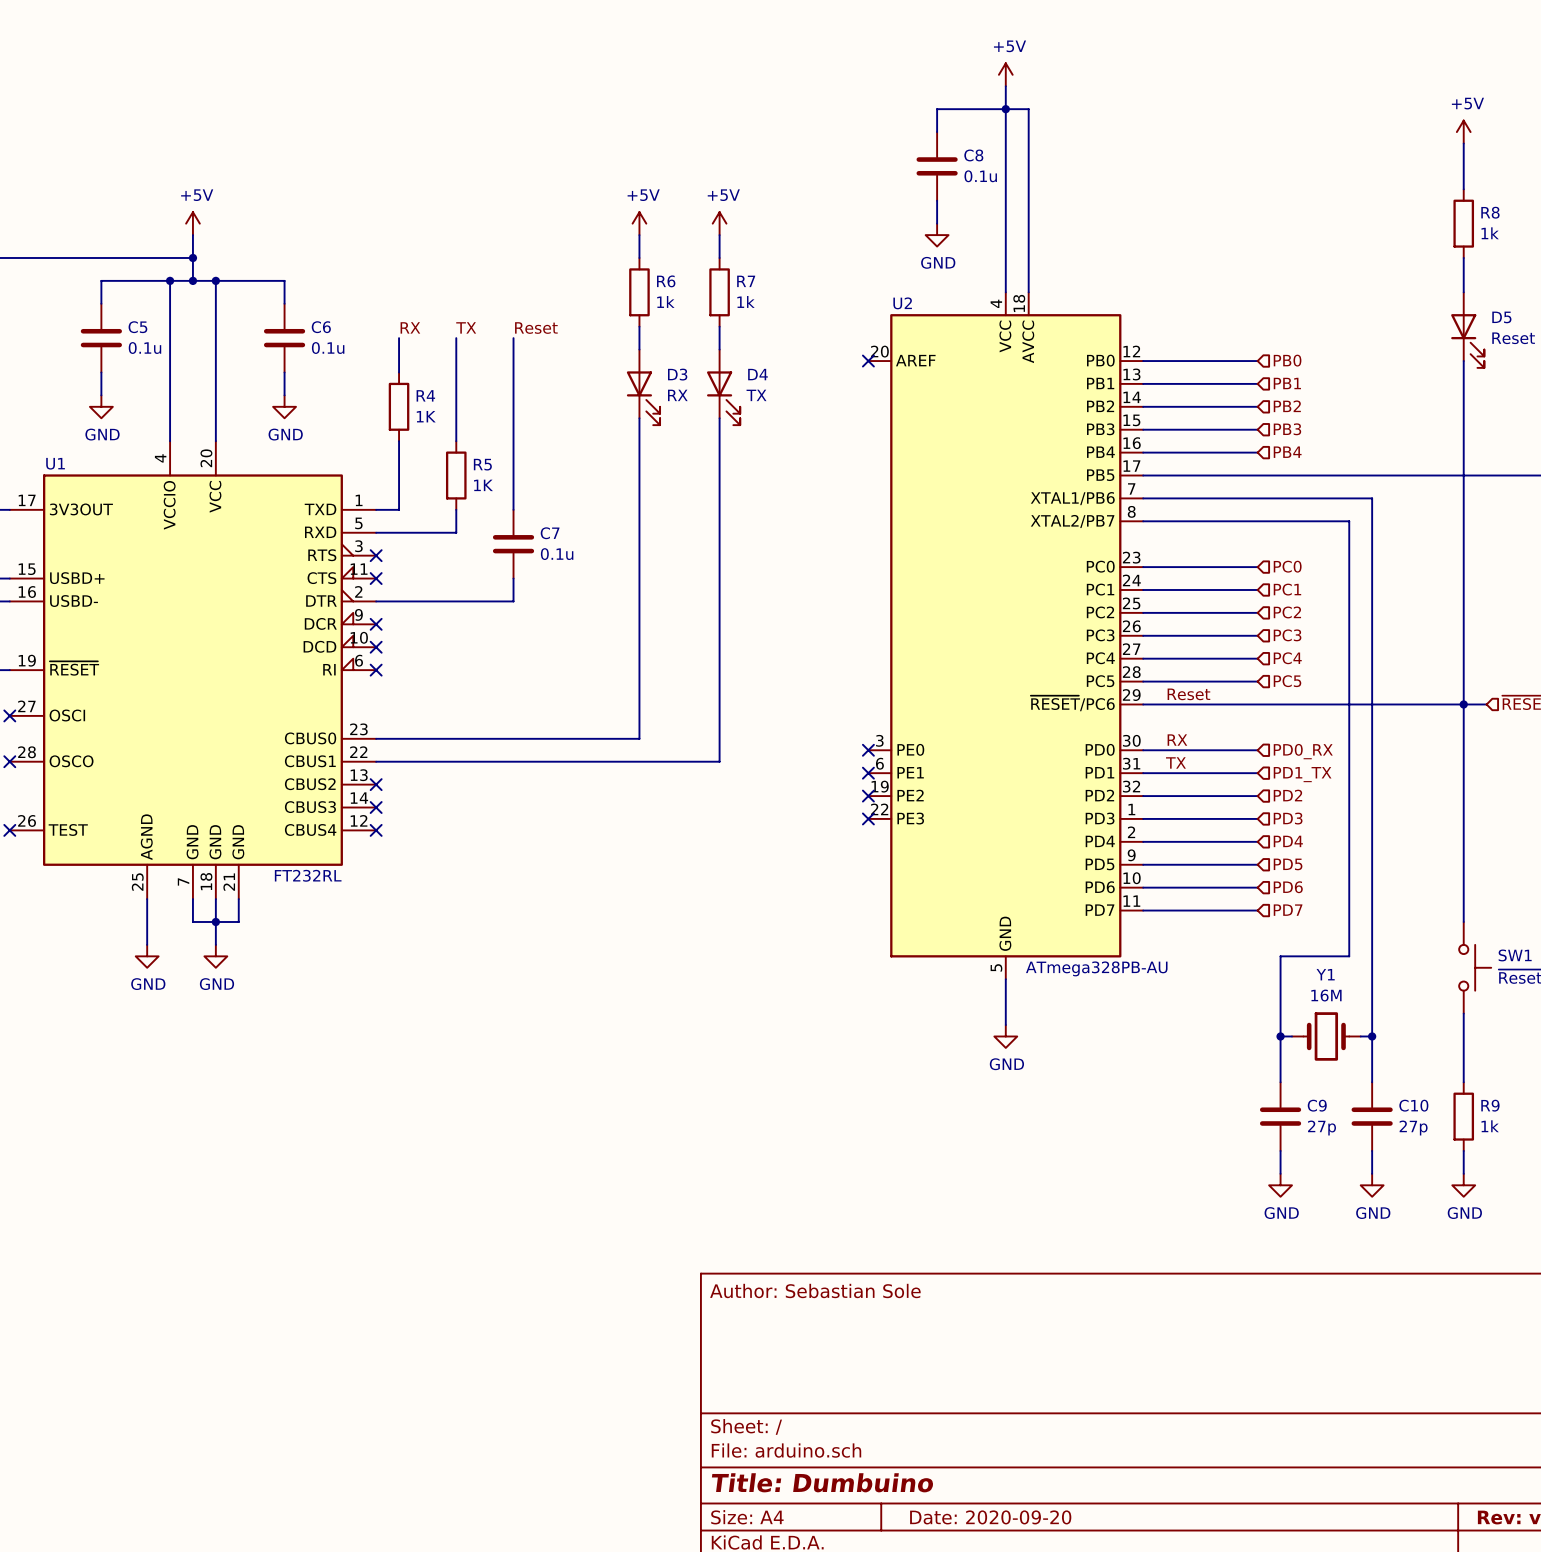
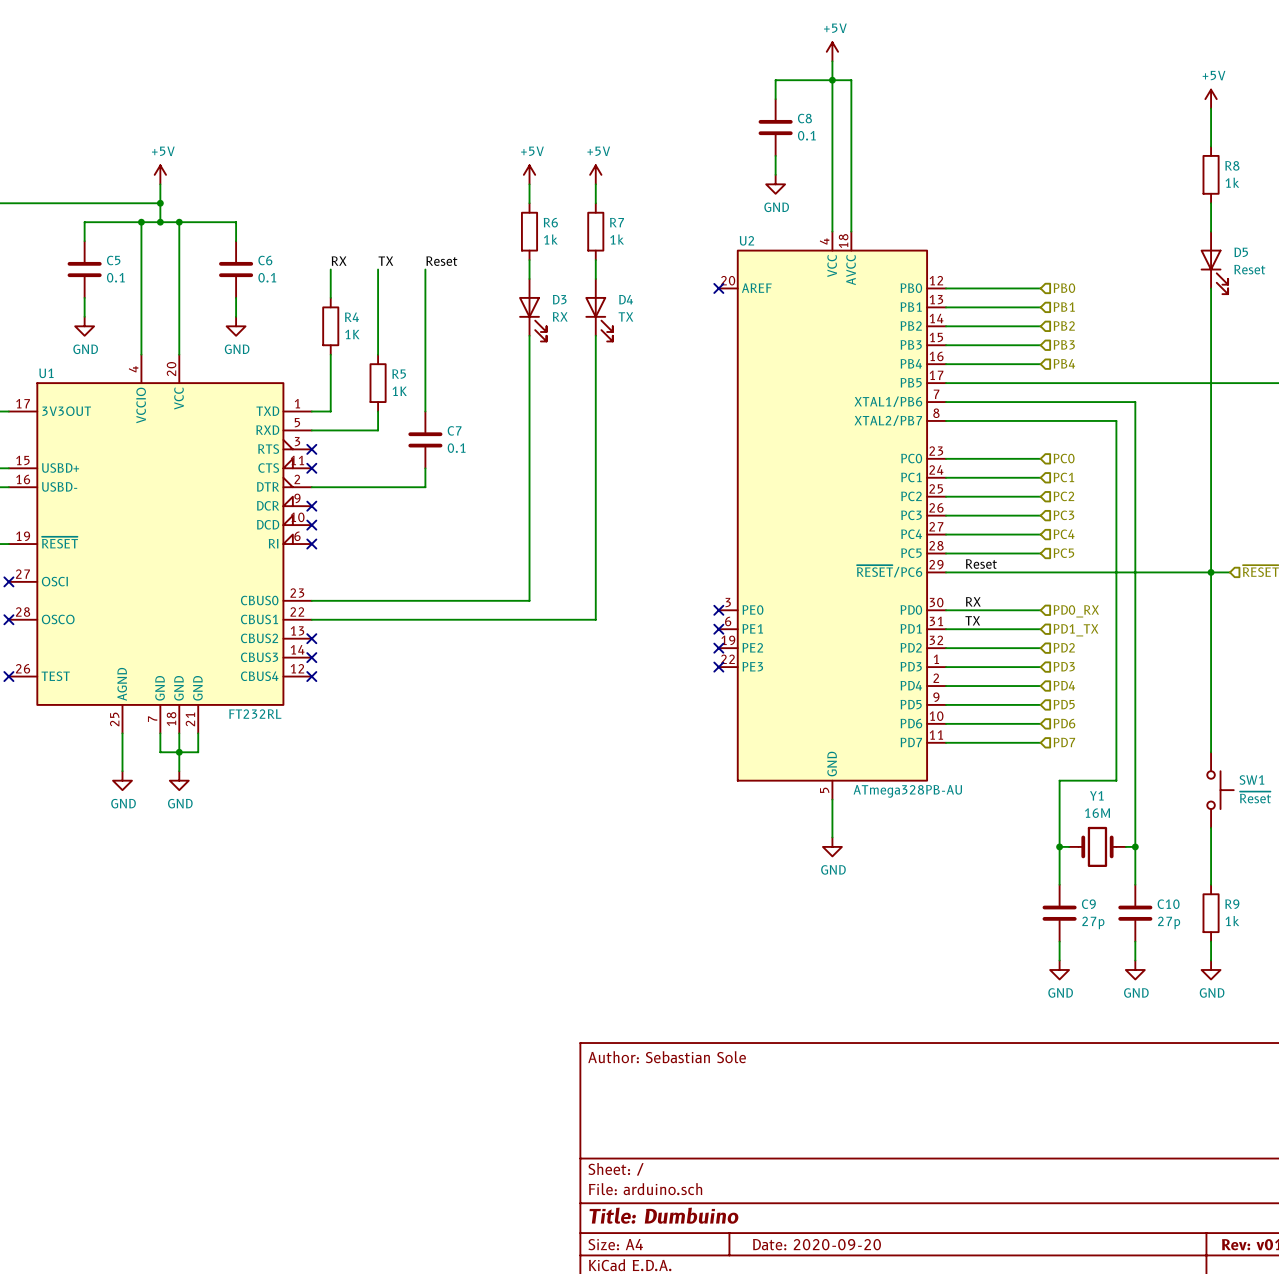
C8 value: 0.1u (980, 176) -> 0.1 (806, 135)
C5 value: 0.1u (144, 348) -> 0.1 (115, 277)
C6 value: 0.1u (328, 348) -> 0.1 (267, 277)
C7 value: 0.1u (557, 554) -> 0.1 (456, 448)

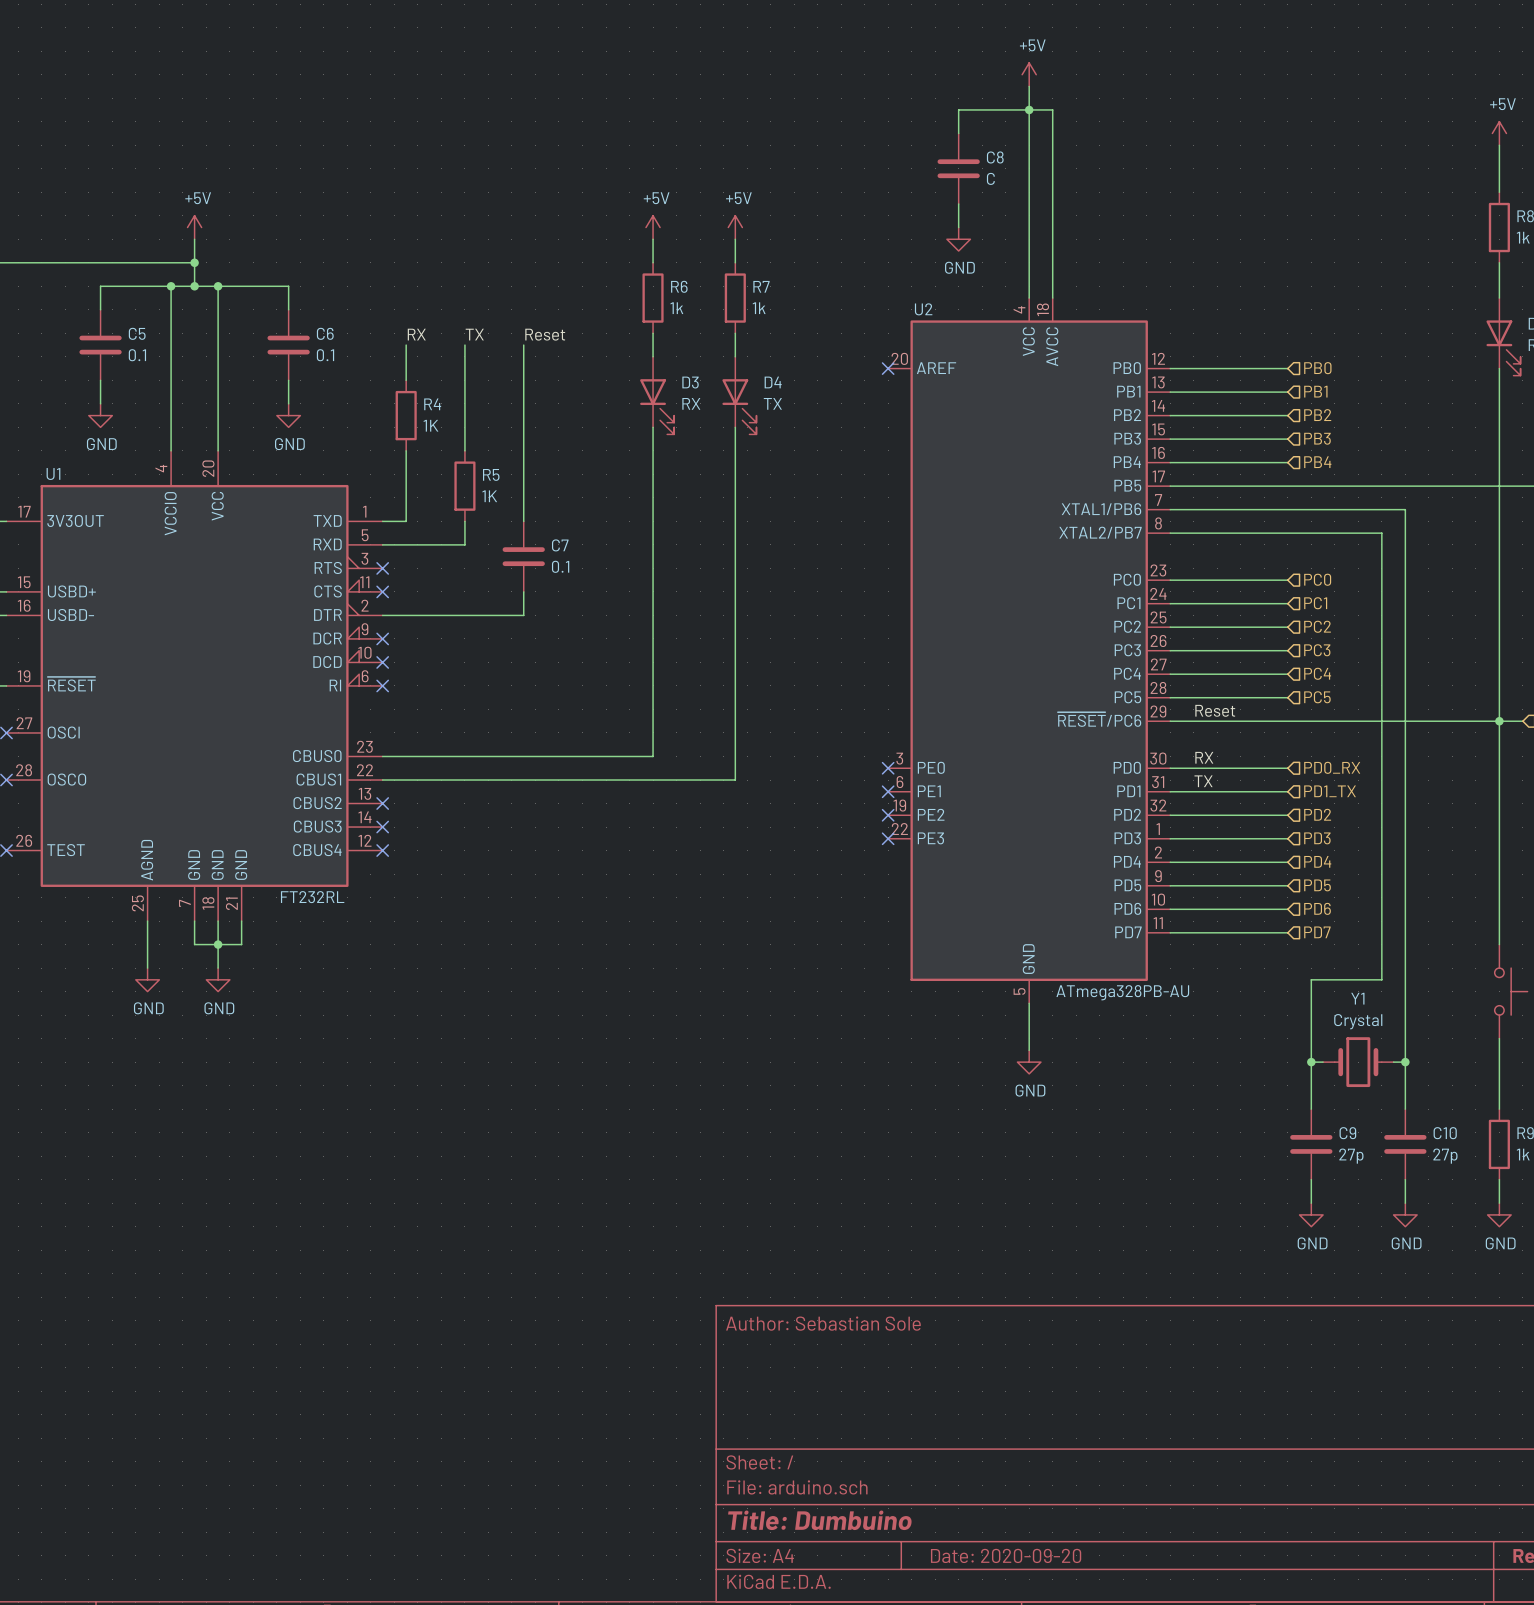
C8 value: 0.1 (806, 135) -> C (990, 178)
Y1 value: 16M (1097, 813) -> Crystal (1358, 1021)

